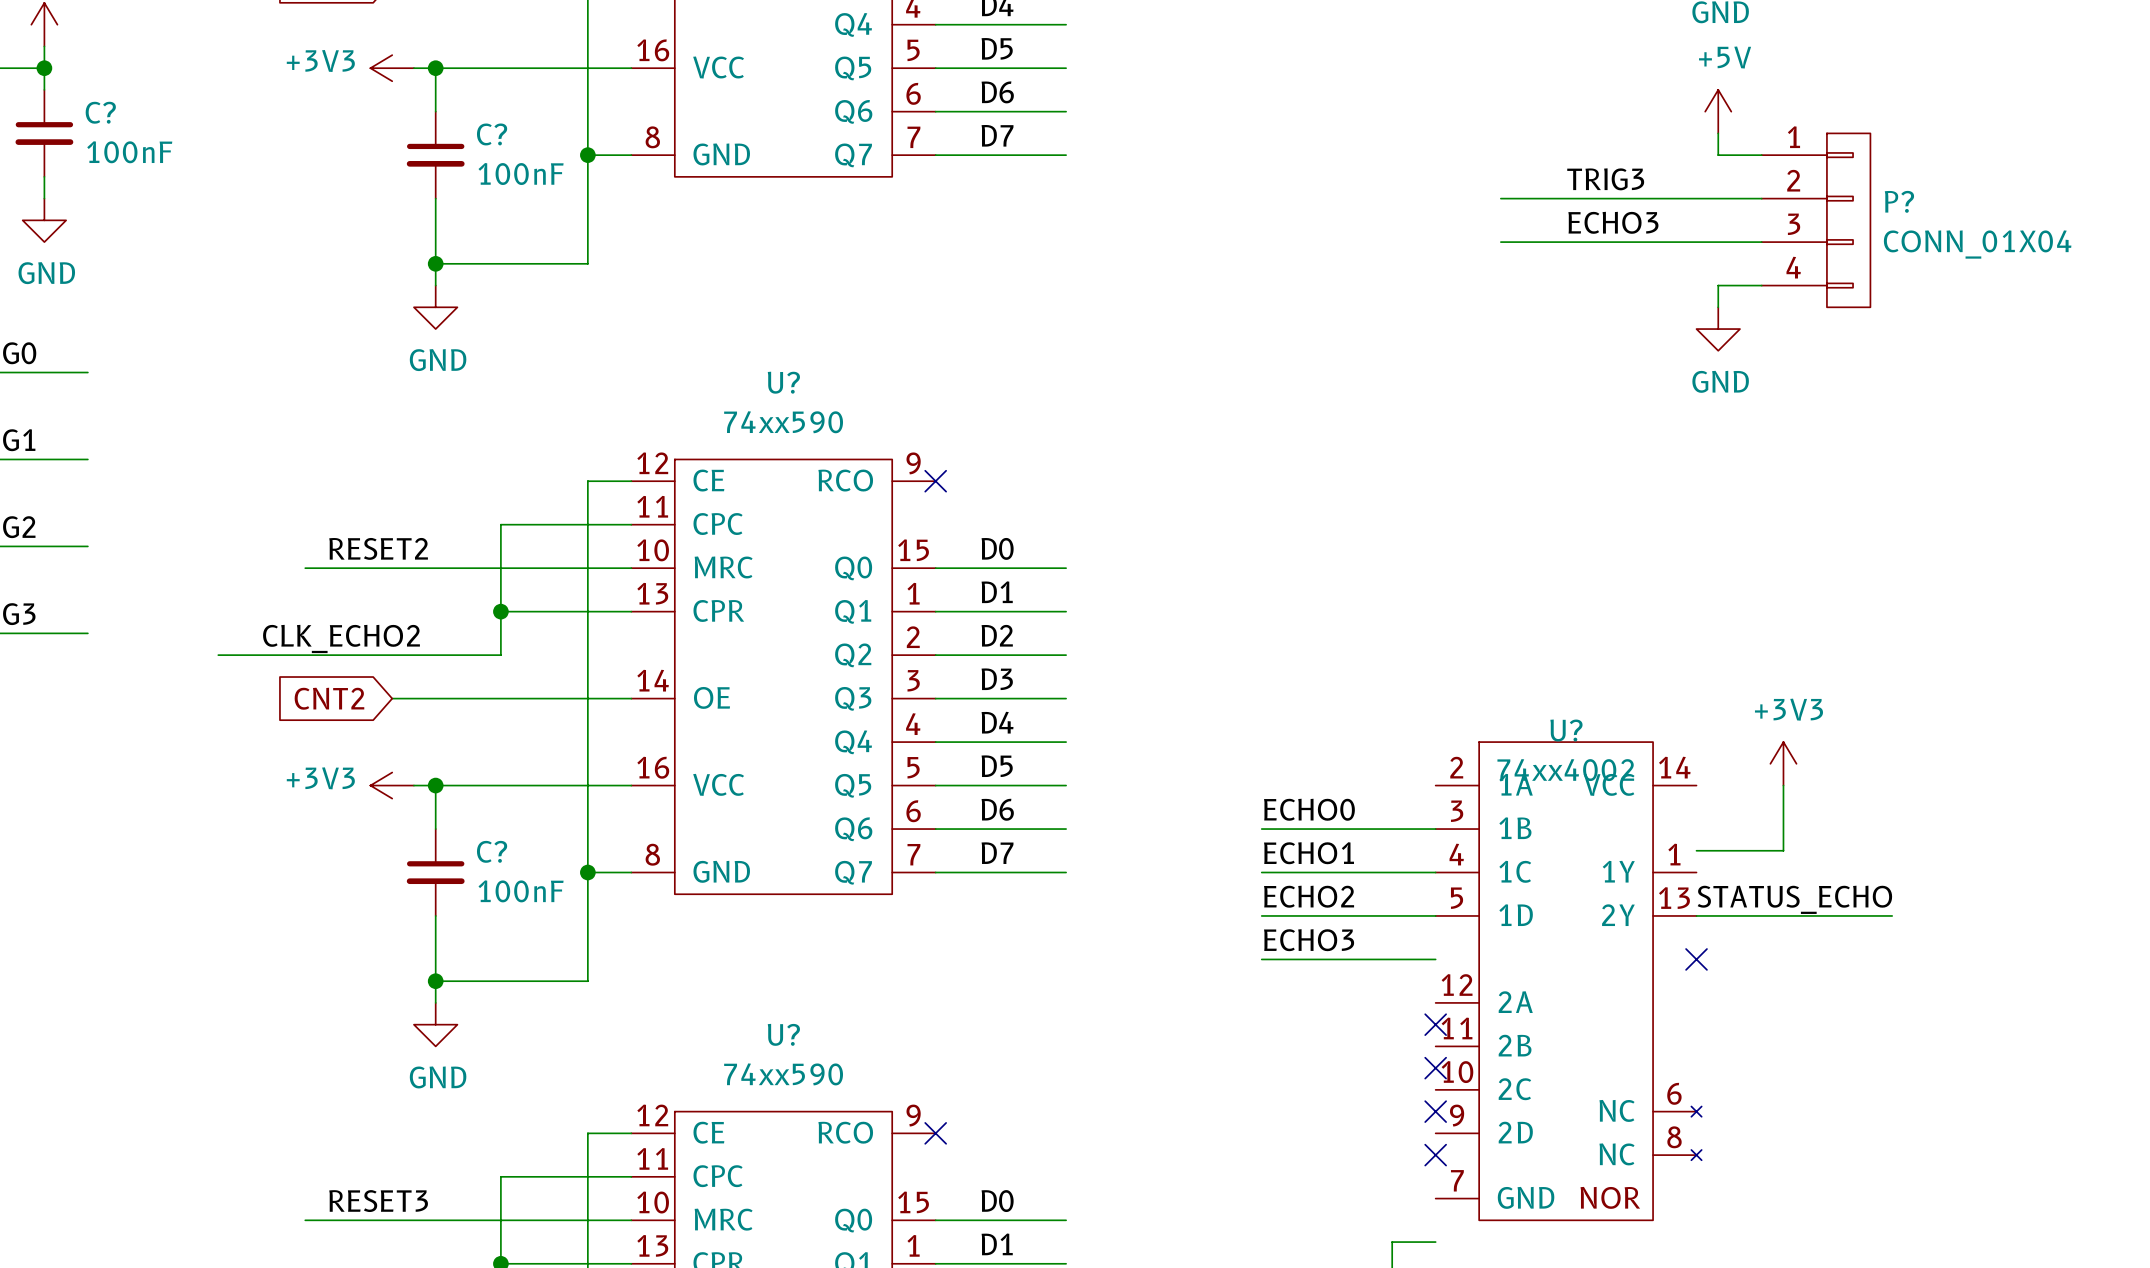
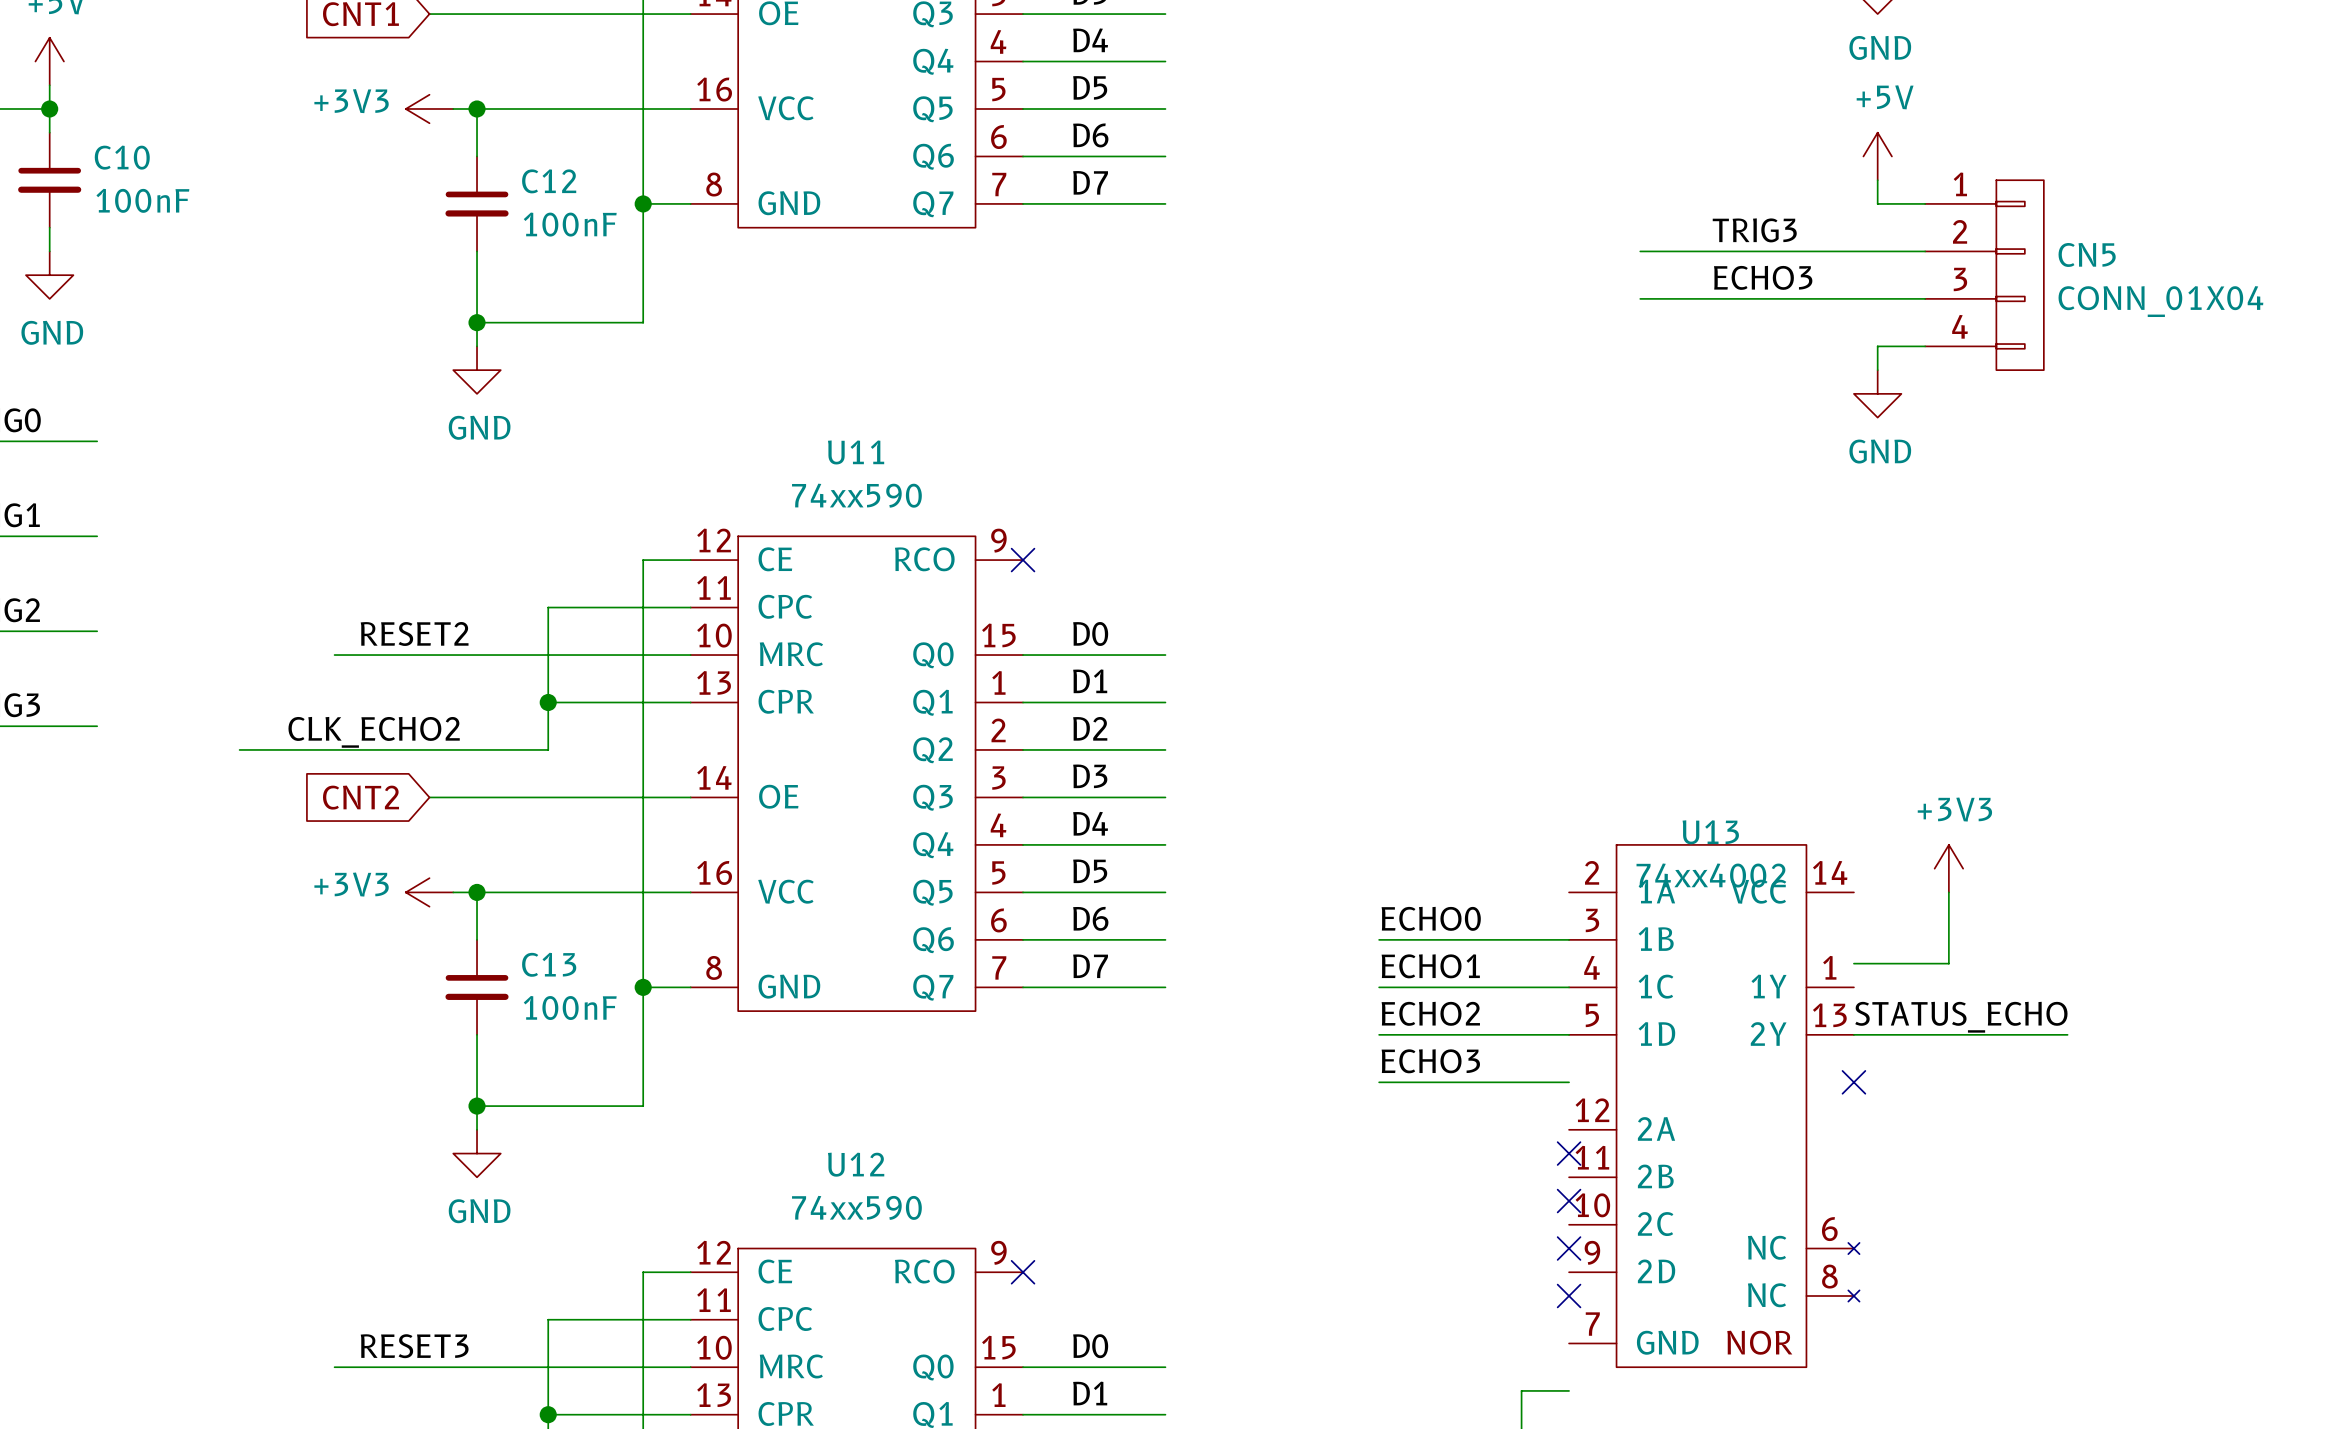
C? name: C? (100, 112) -> C10 (122, 157)
C? name: C? (492, 134) -> C12 (549, 181)
P? name: P? (1899, 201) -> CN5 (2087, 254)
U? name: U? (783, 382) -> U11 (856, 452)
U? name: U? (1566, 730) -> U13 (1710, 832)
C? name: C? (492, 851) -> C13 (549, 964)
U? name: U? (783, 1034) -> U12 (856, 1164)

